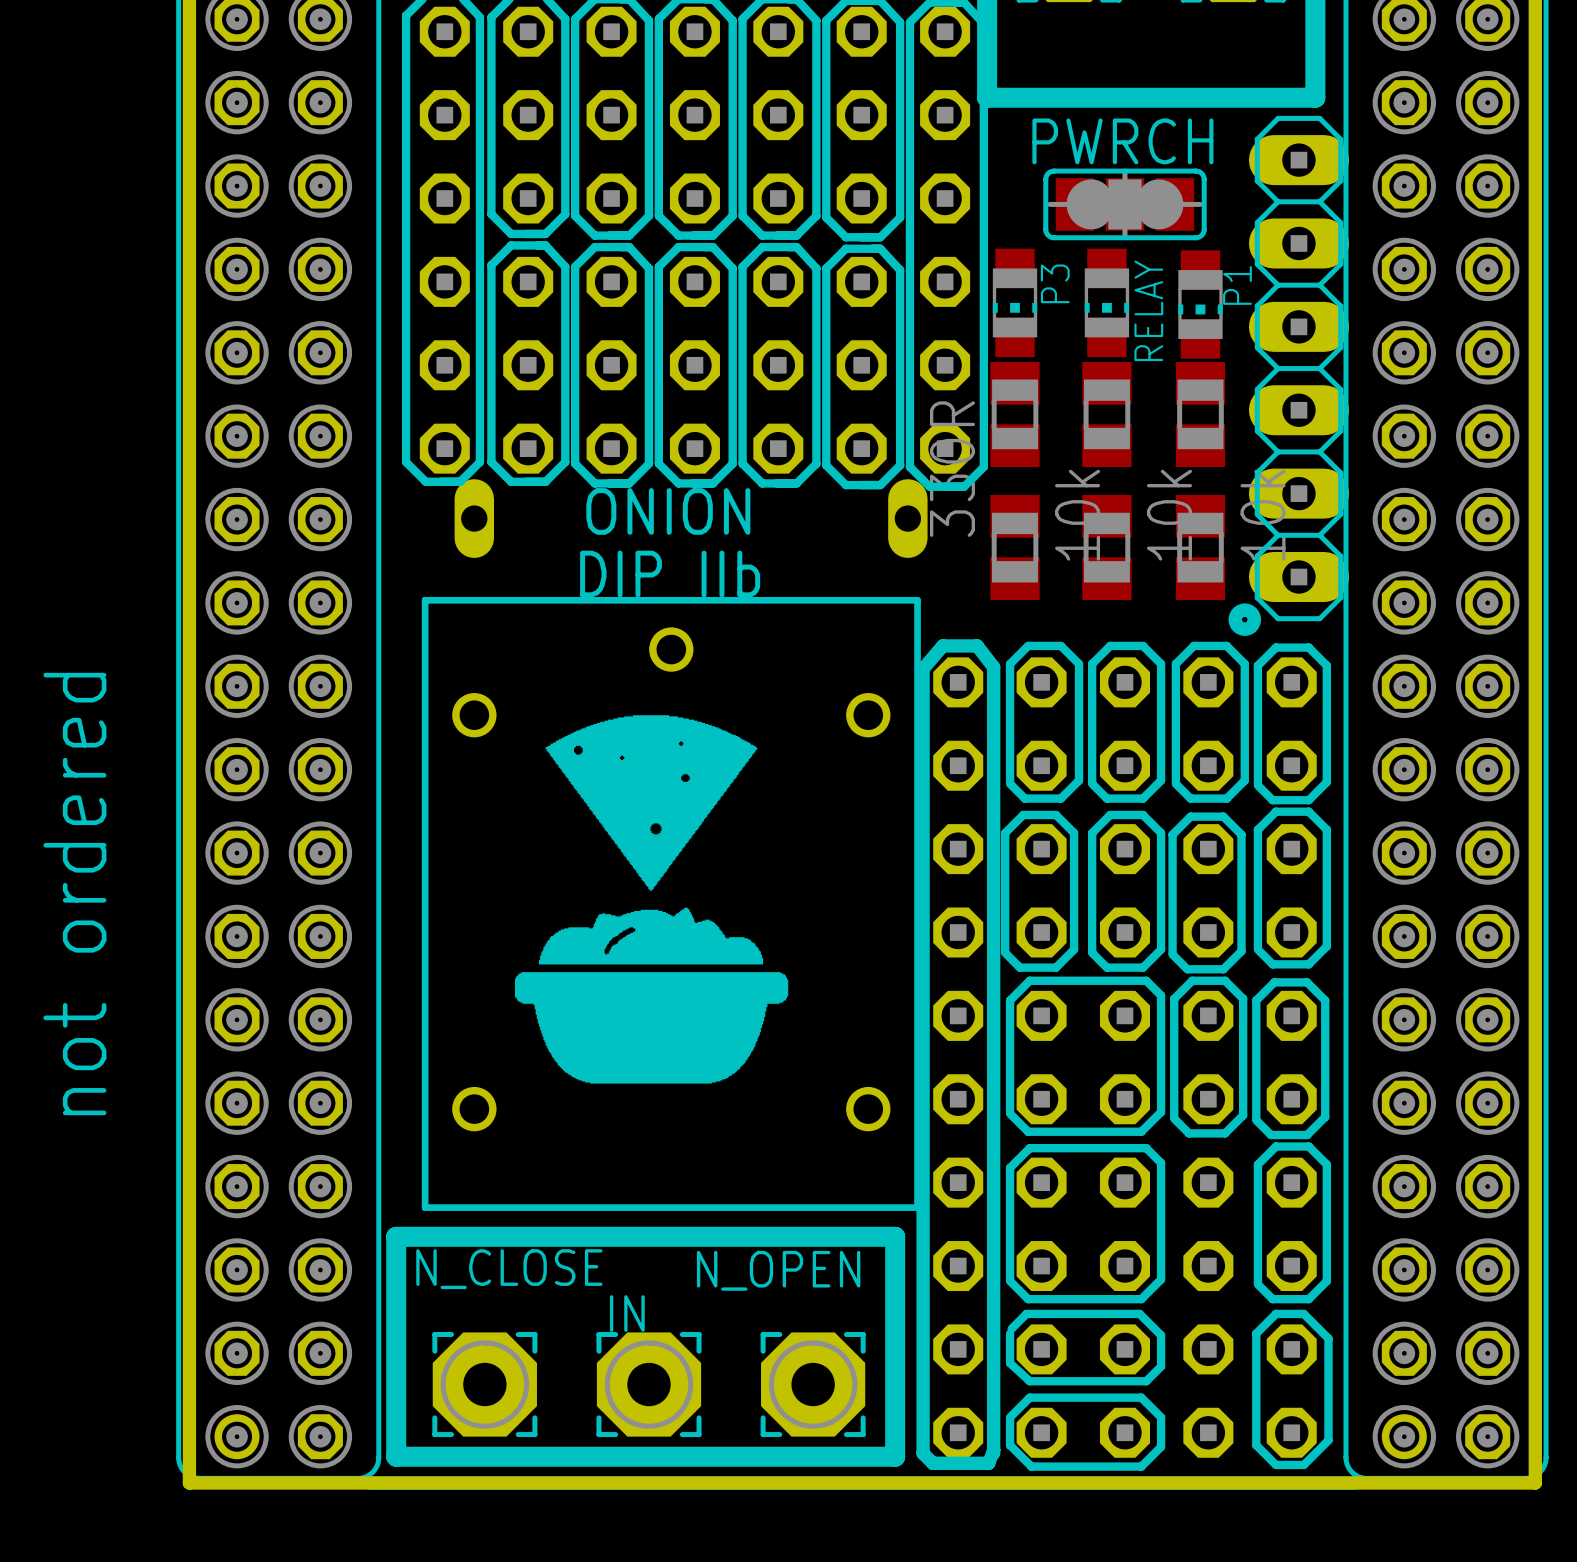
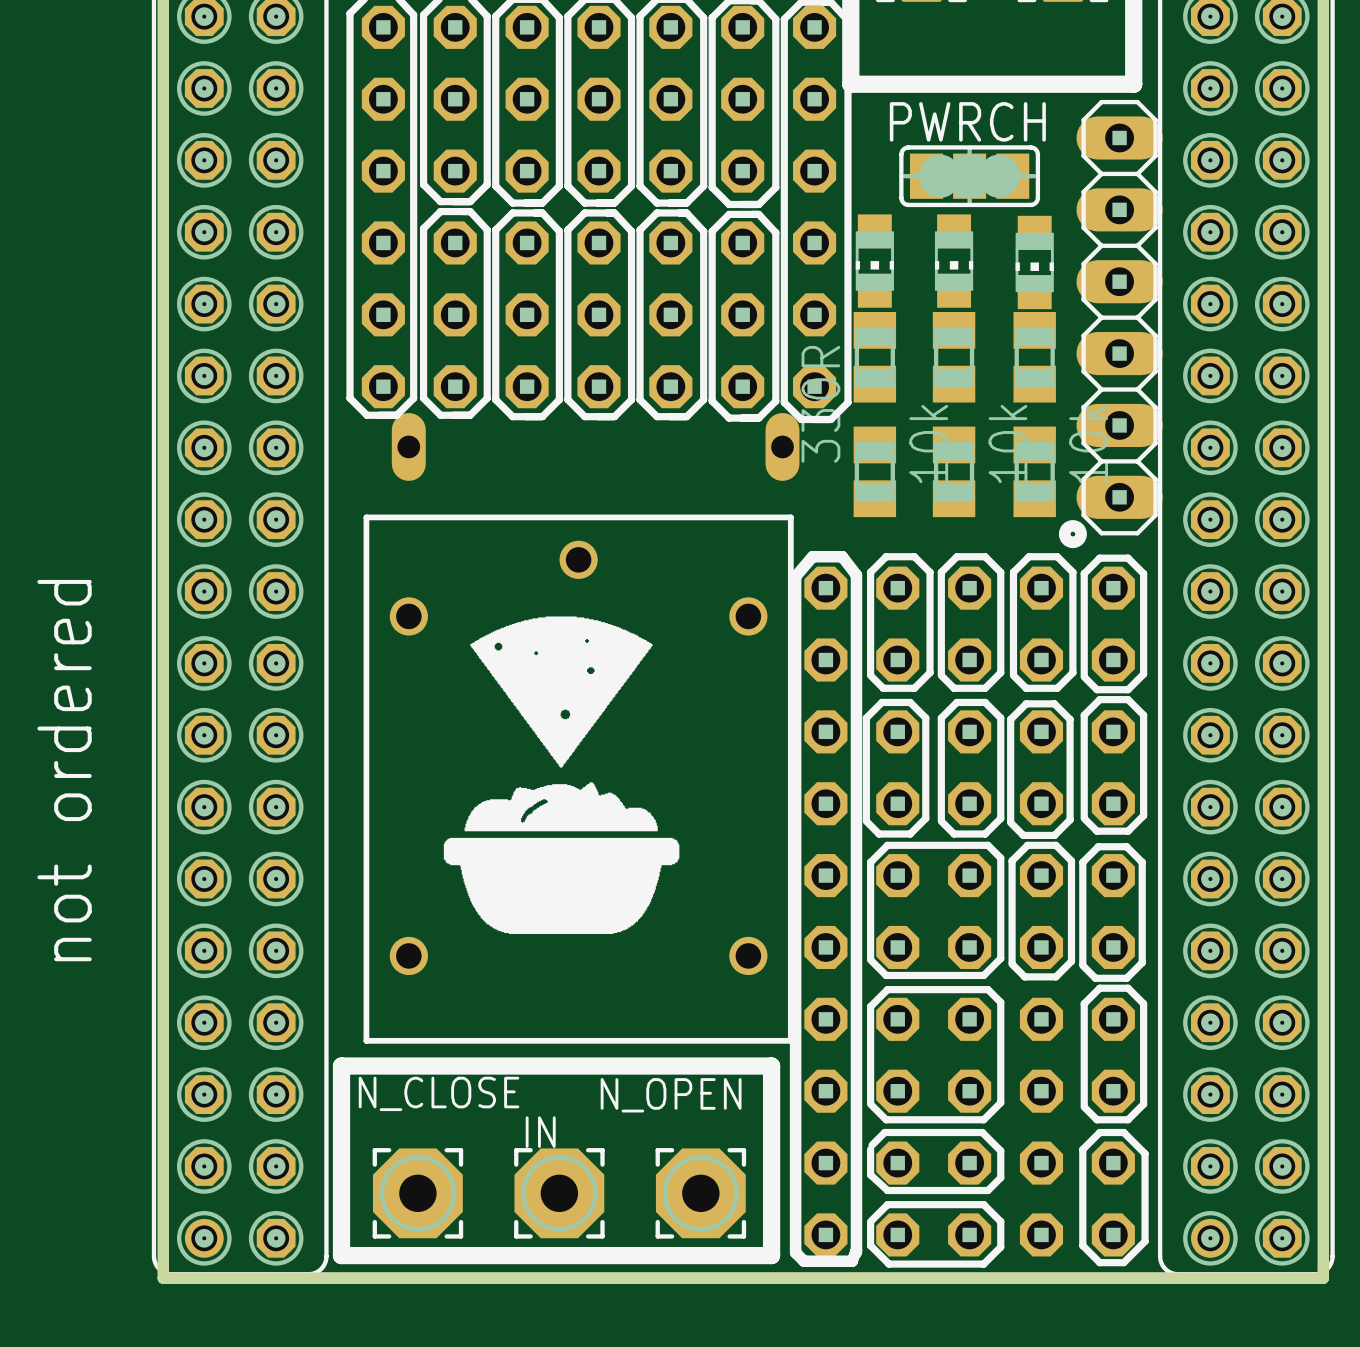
P3 name: P3 (1055, 283) -> none
P1 name: P1 (1237, 285) -> none
RELAY name: RELAY (1148, 310) -> none
text: ONION (668, 511) -> none
text: DIP IIb (670, 573) -> none

